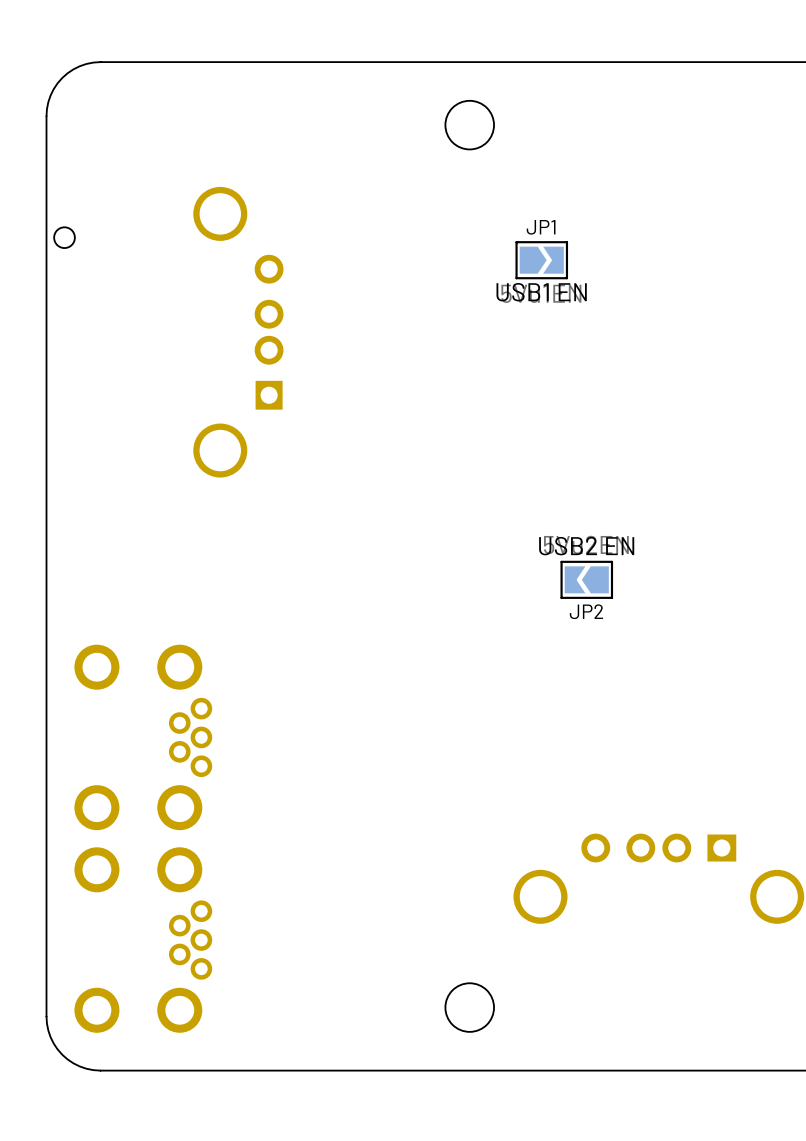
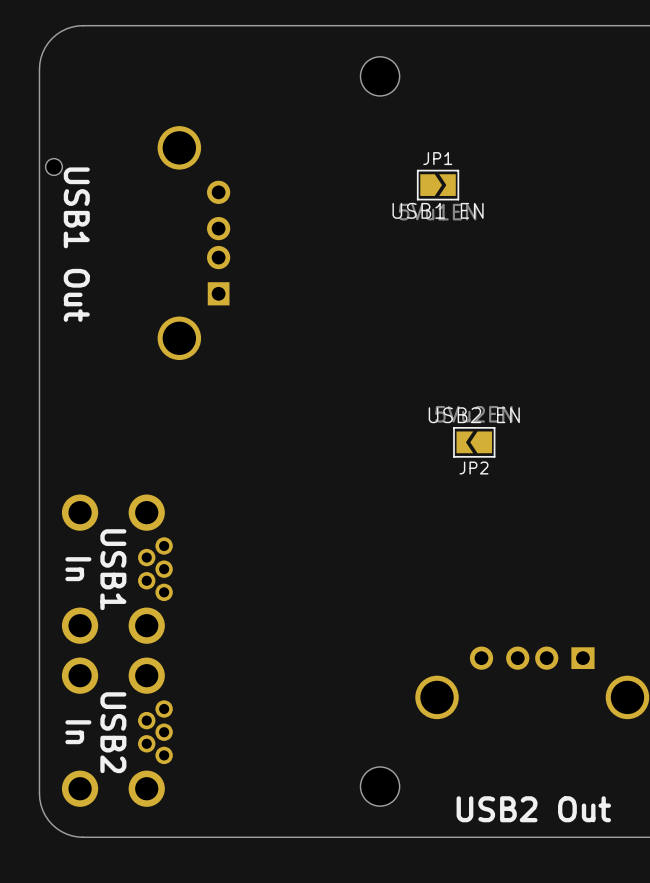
text: none -> USB1 Out (76, 244)
text: none -> In (78, 569)
text: none -> USB1 (113, 569)
text: none -> In (78, 732)
text: none -> USB2 (113, 732)
text: none -> USB2 Out (533, 809)

